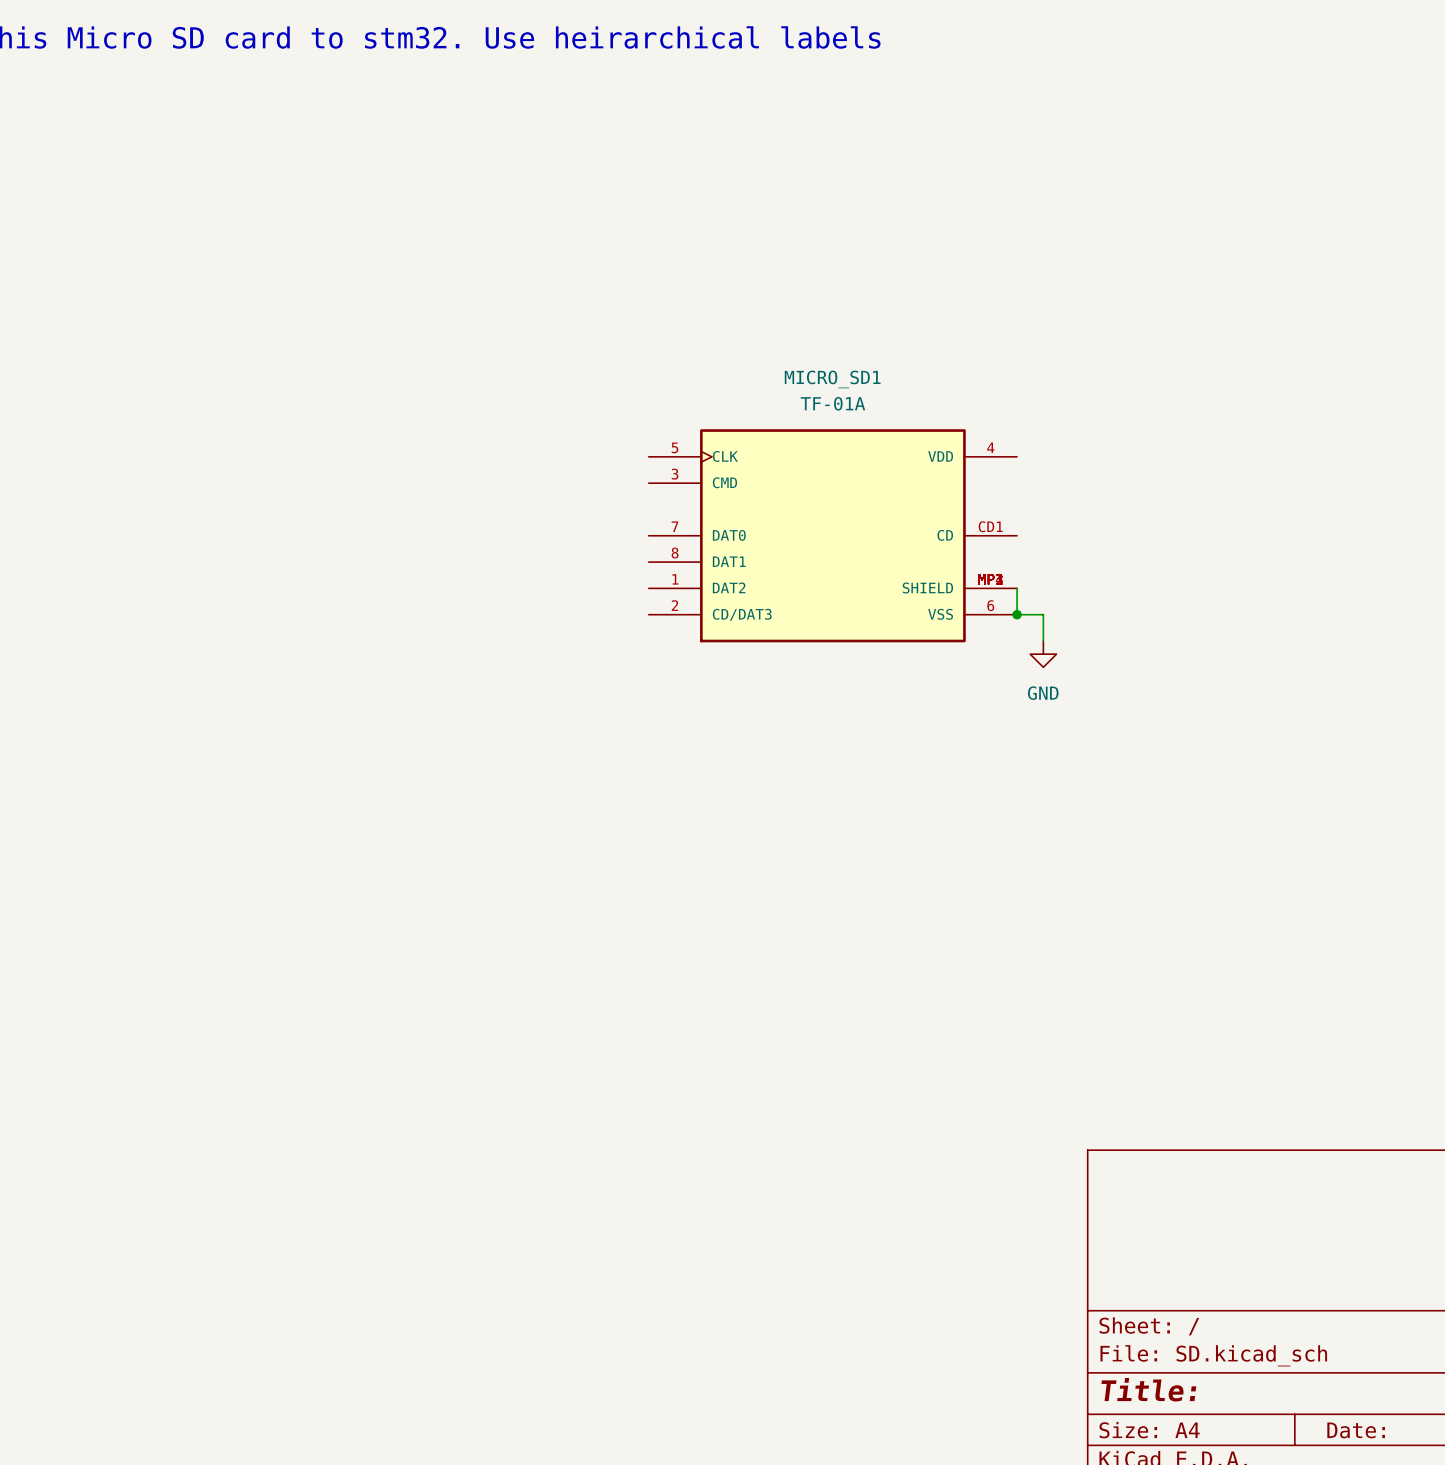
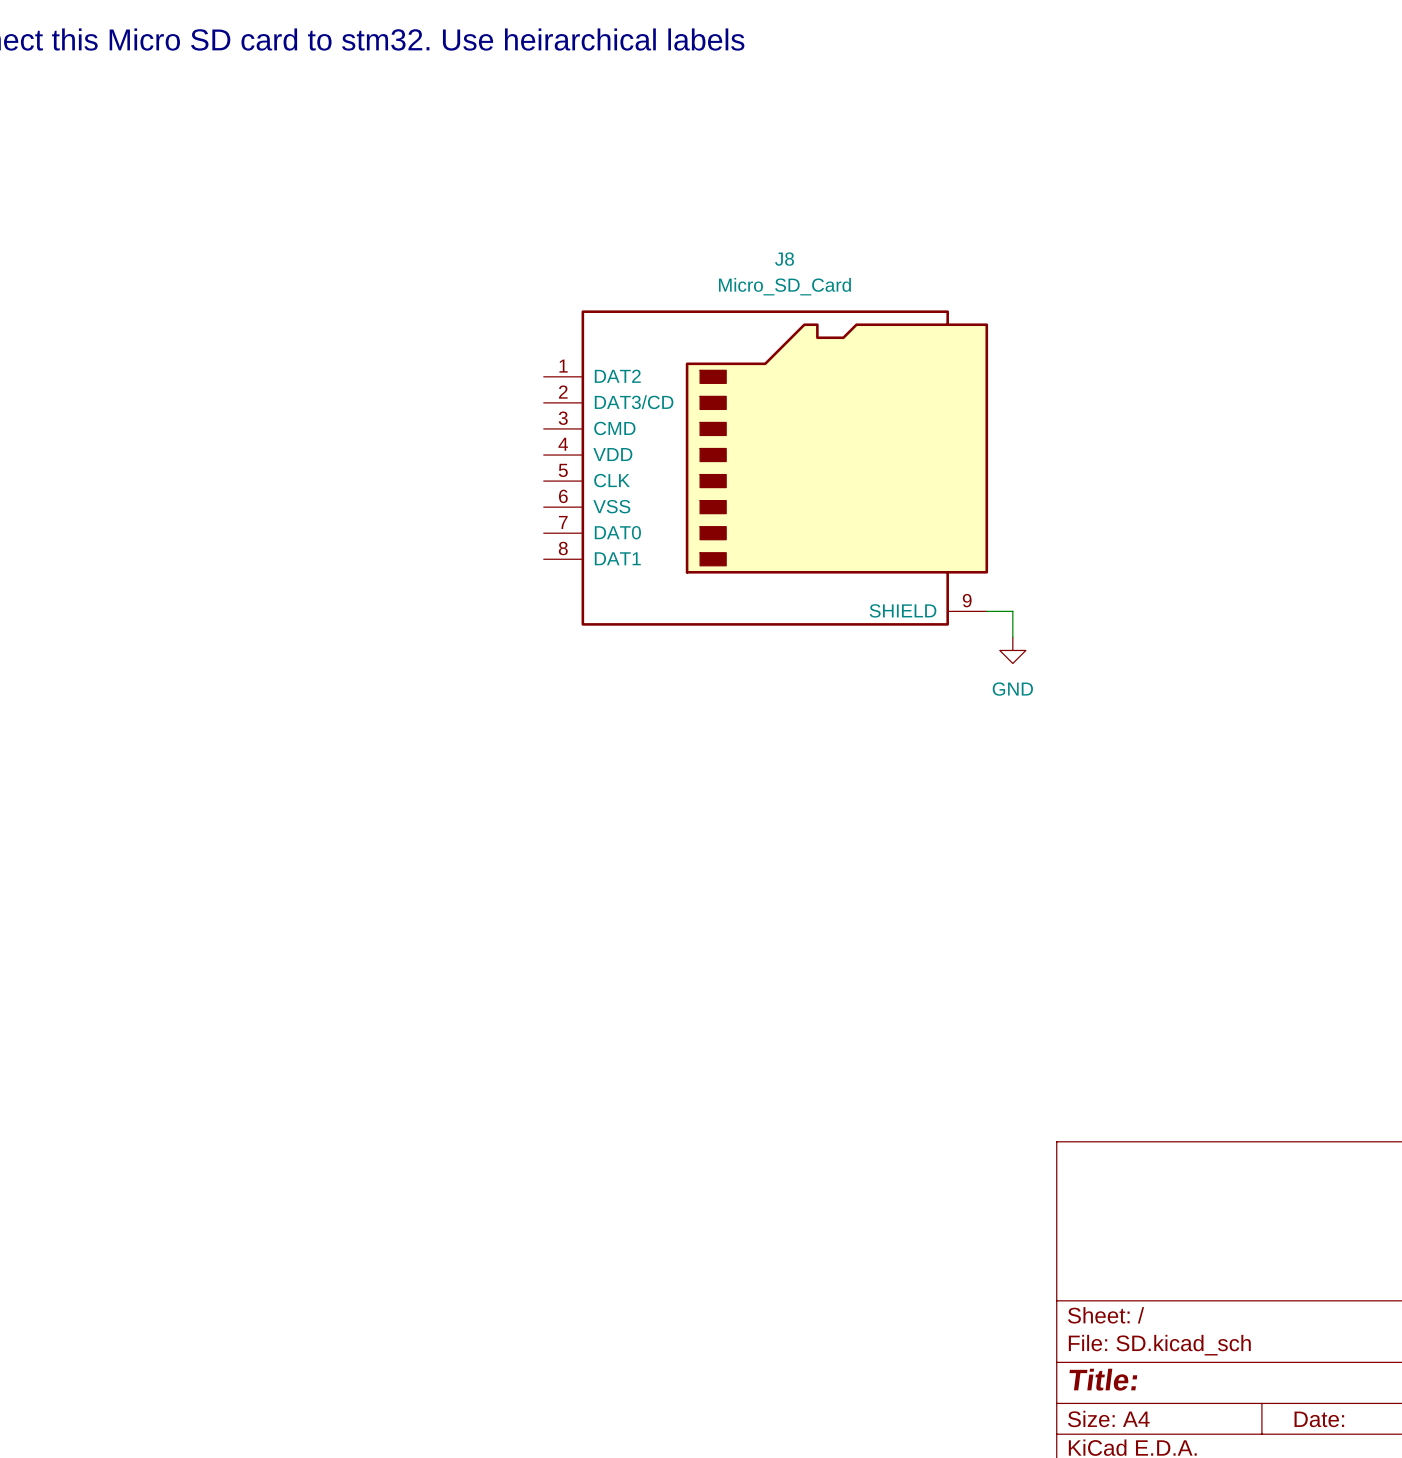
J8: none -> Micro_SD_Card (765, 468)
MICRO_SD1: TF-01A (832, 535) -> none
wire: (1017, 588) (1017, 614) -> none
junction: (1017, 614) -> none

